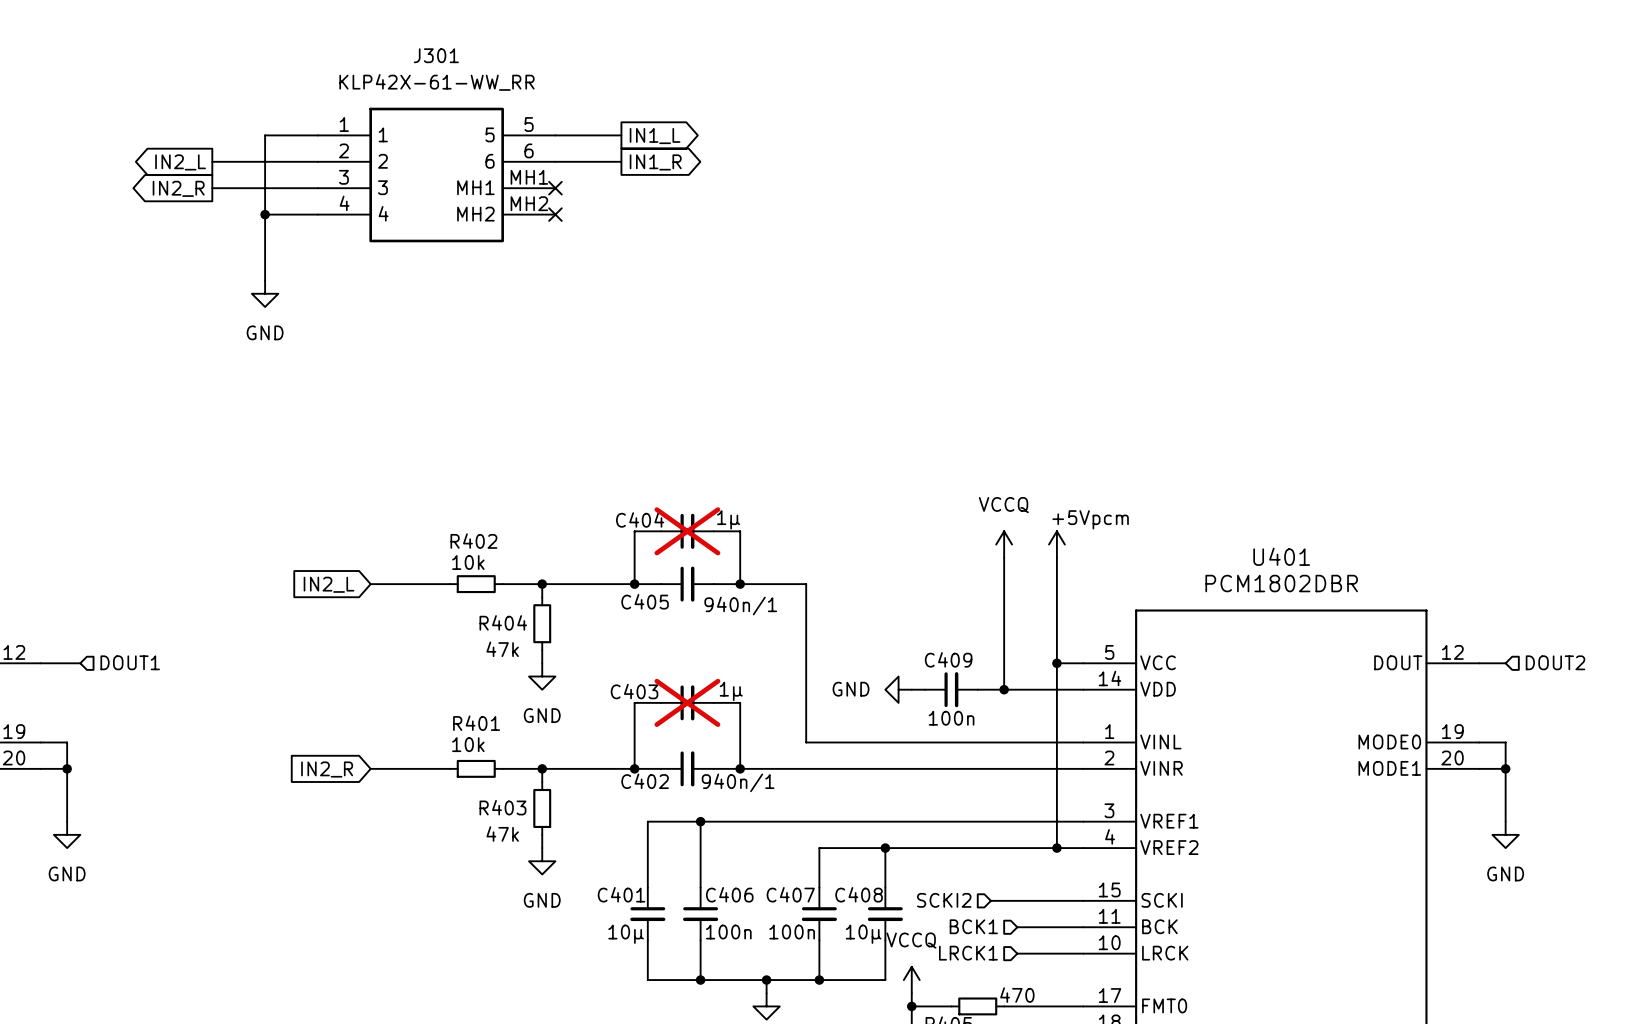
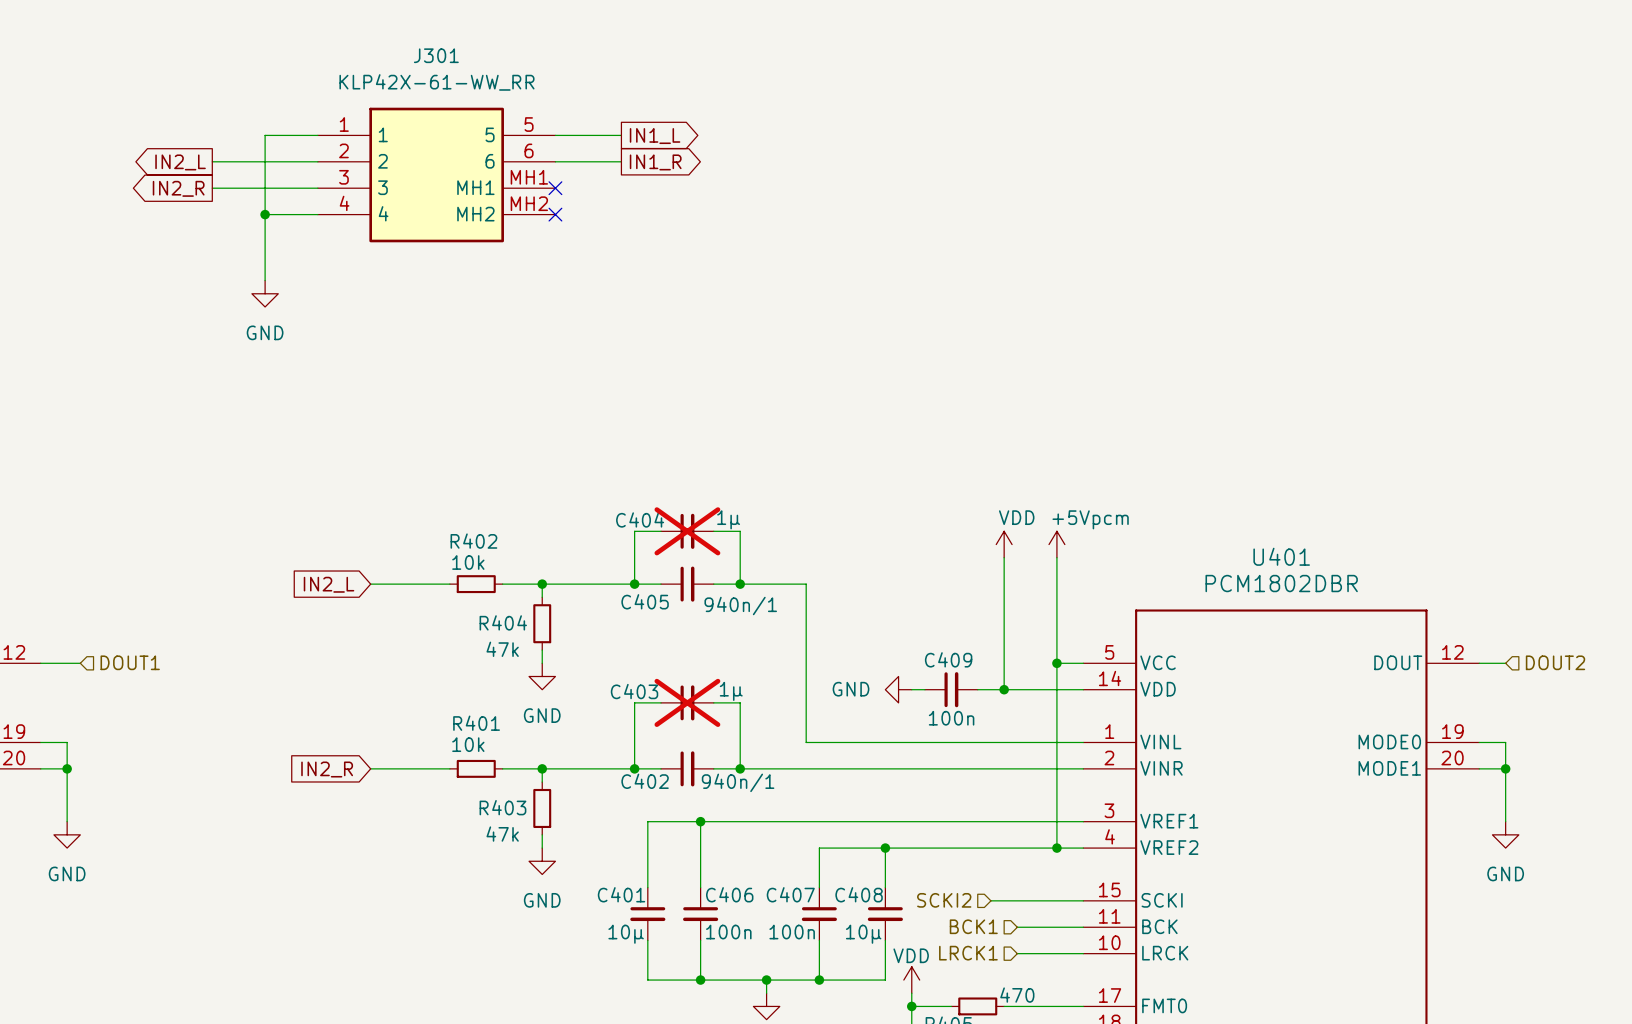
power symbol: VCCQ (1004, 544) -> VDD (1004, 544)
power symbol: VCCQ (911, 980) -> VDD (911, 980)

